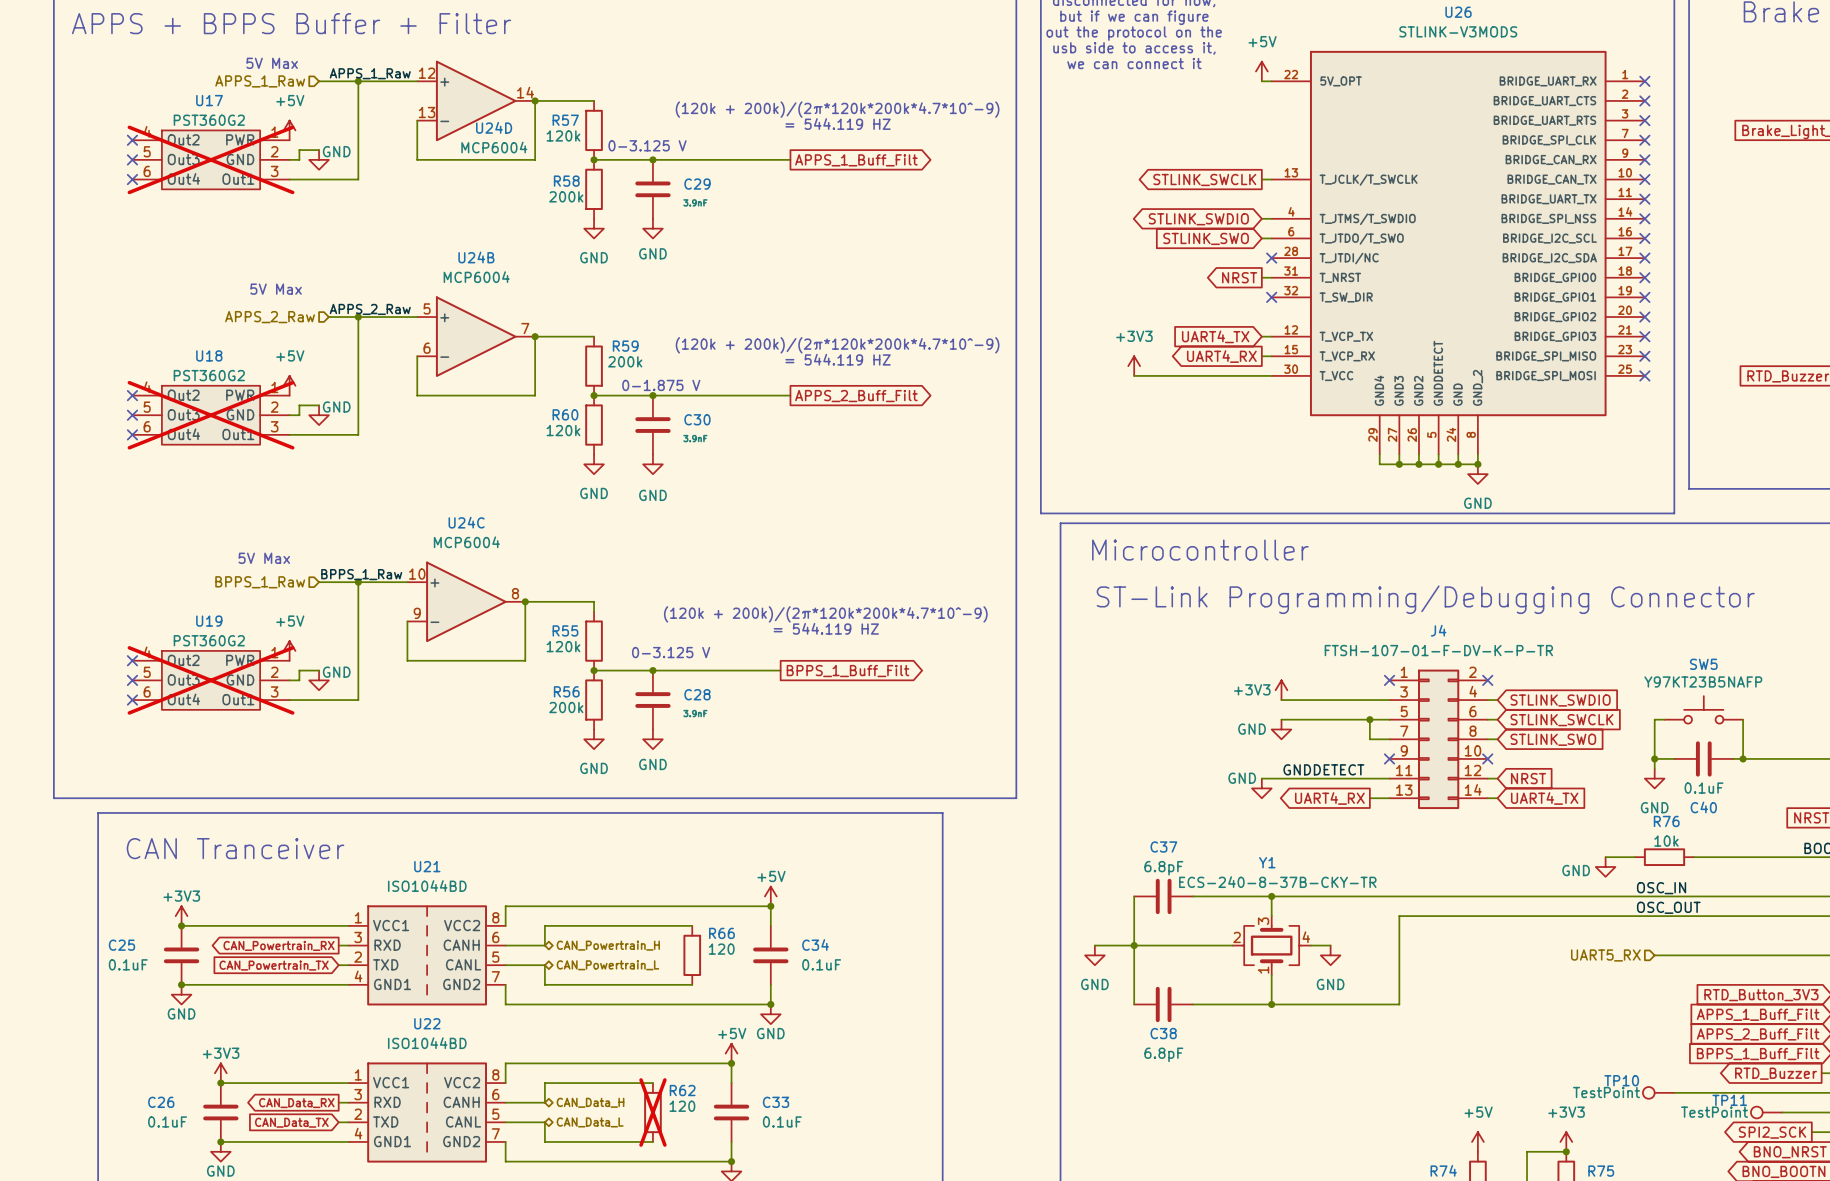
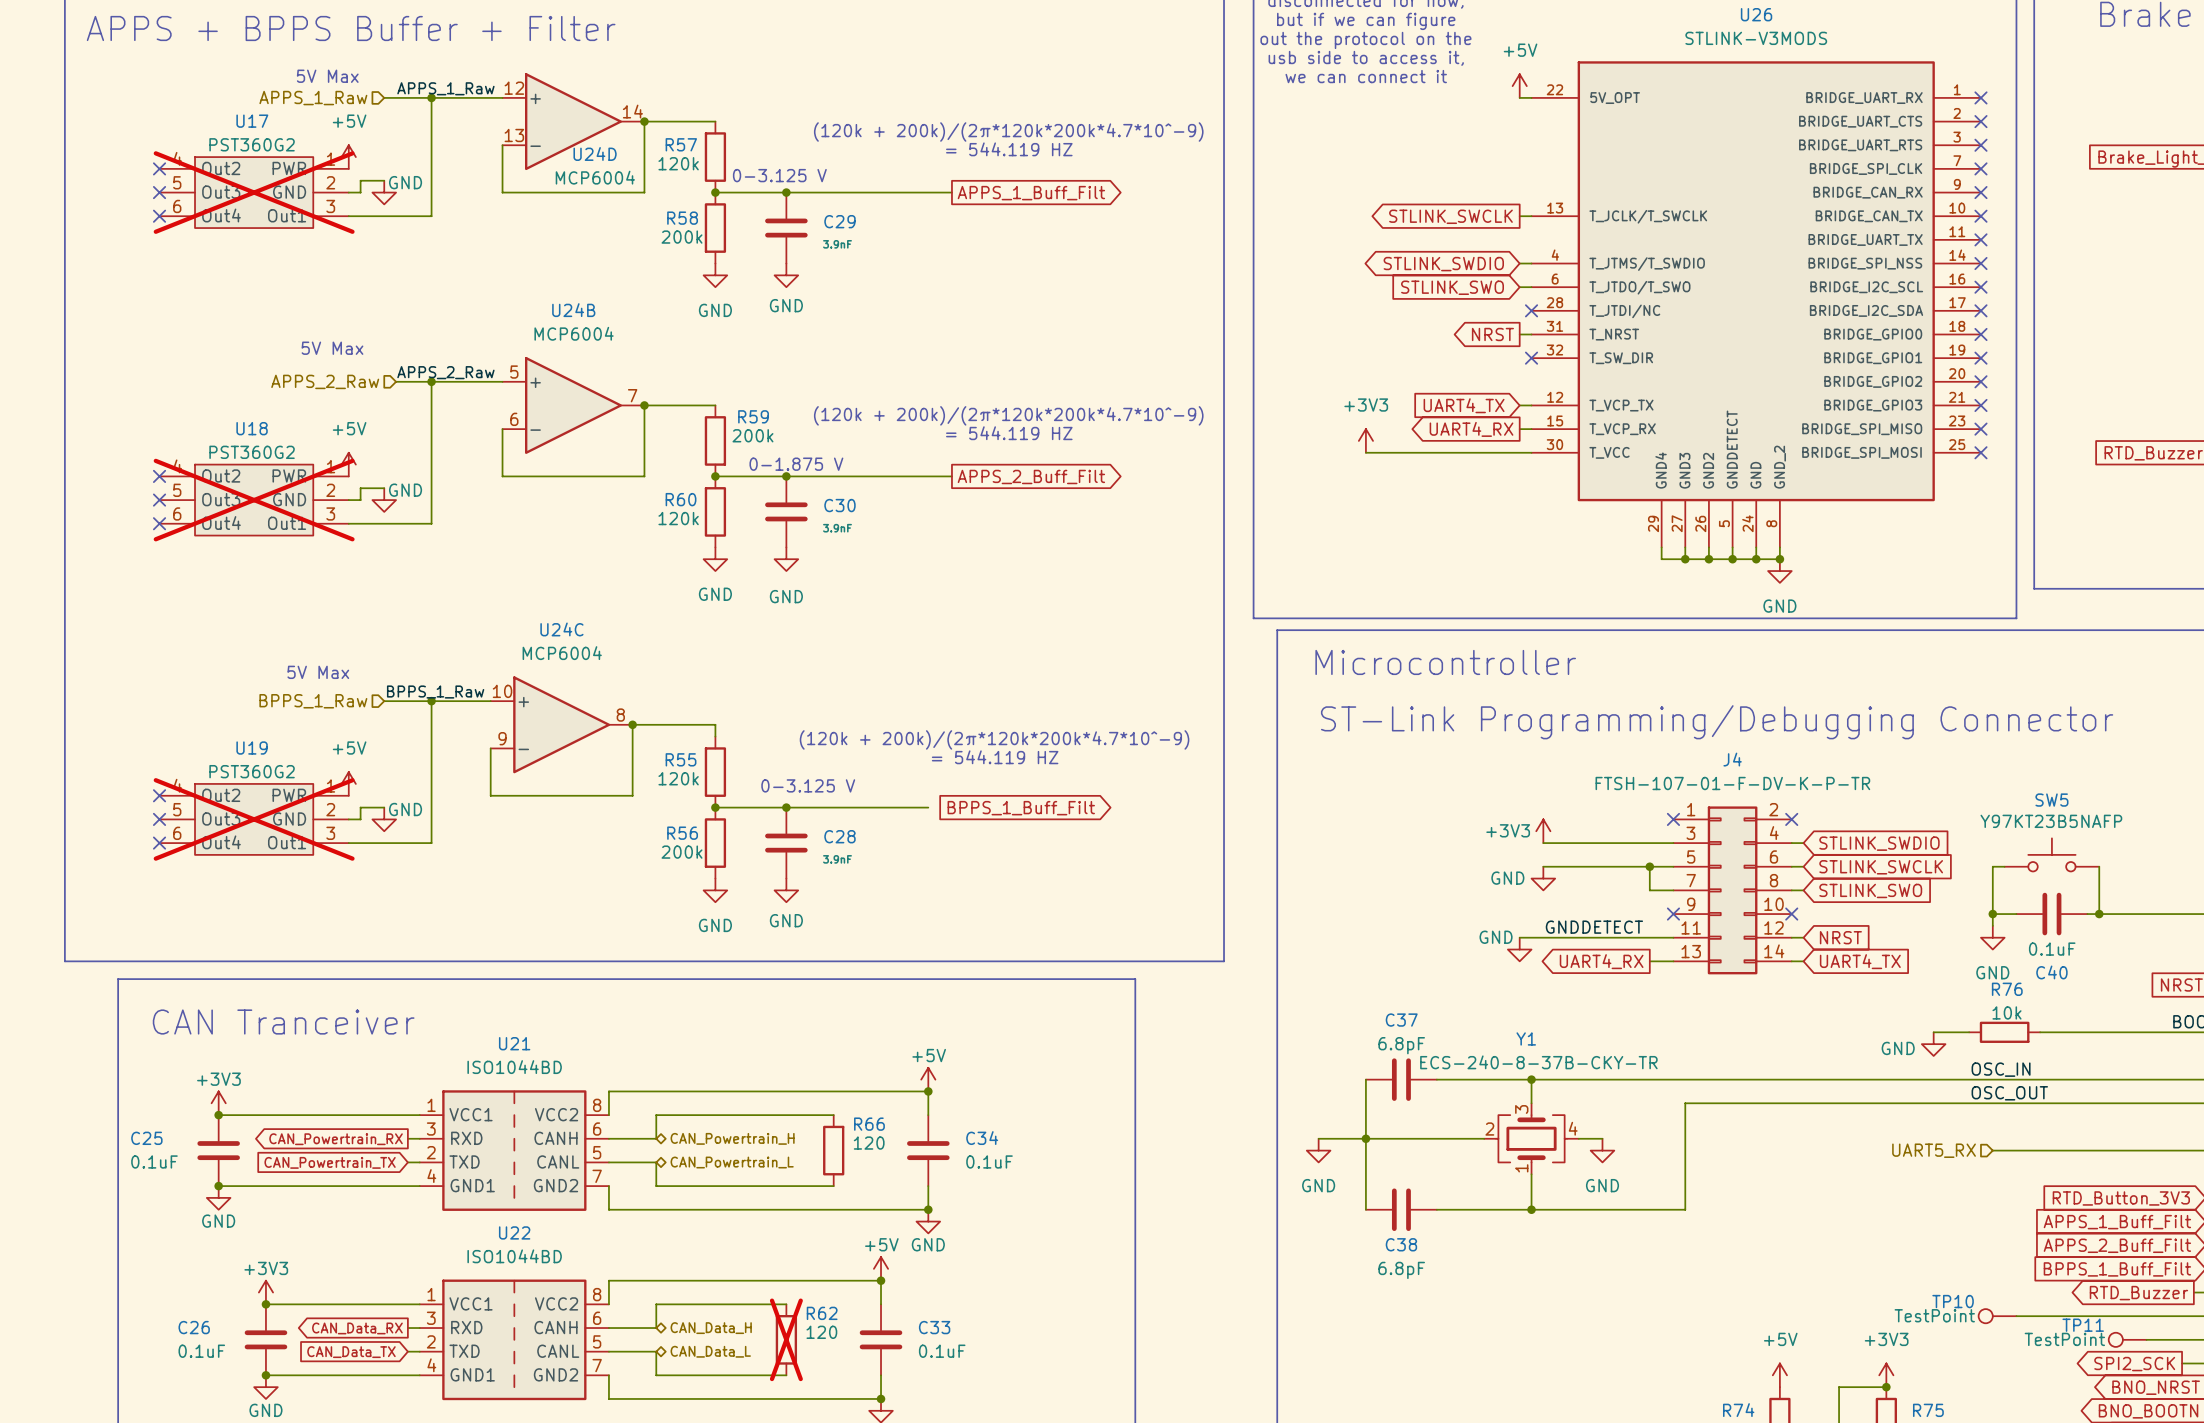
wire: (770, 670) (780, 670) -> none

